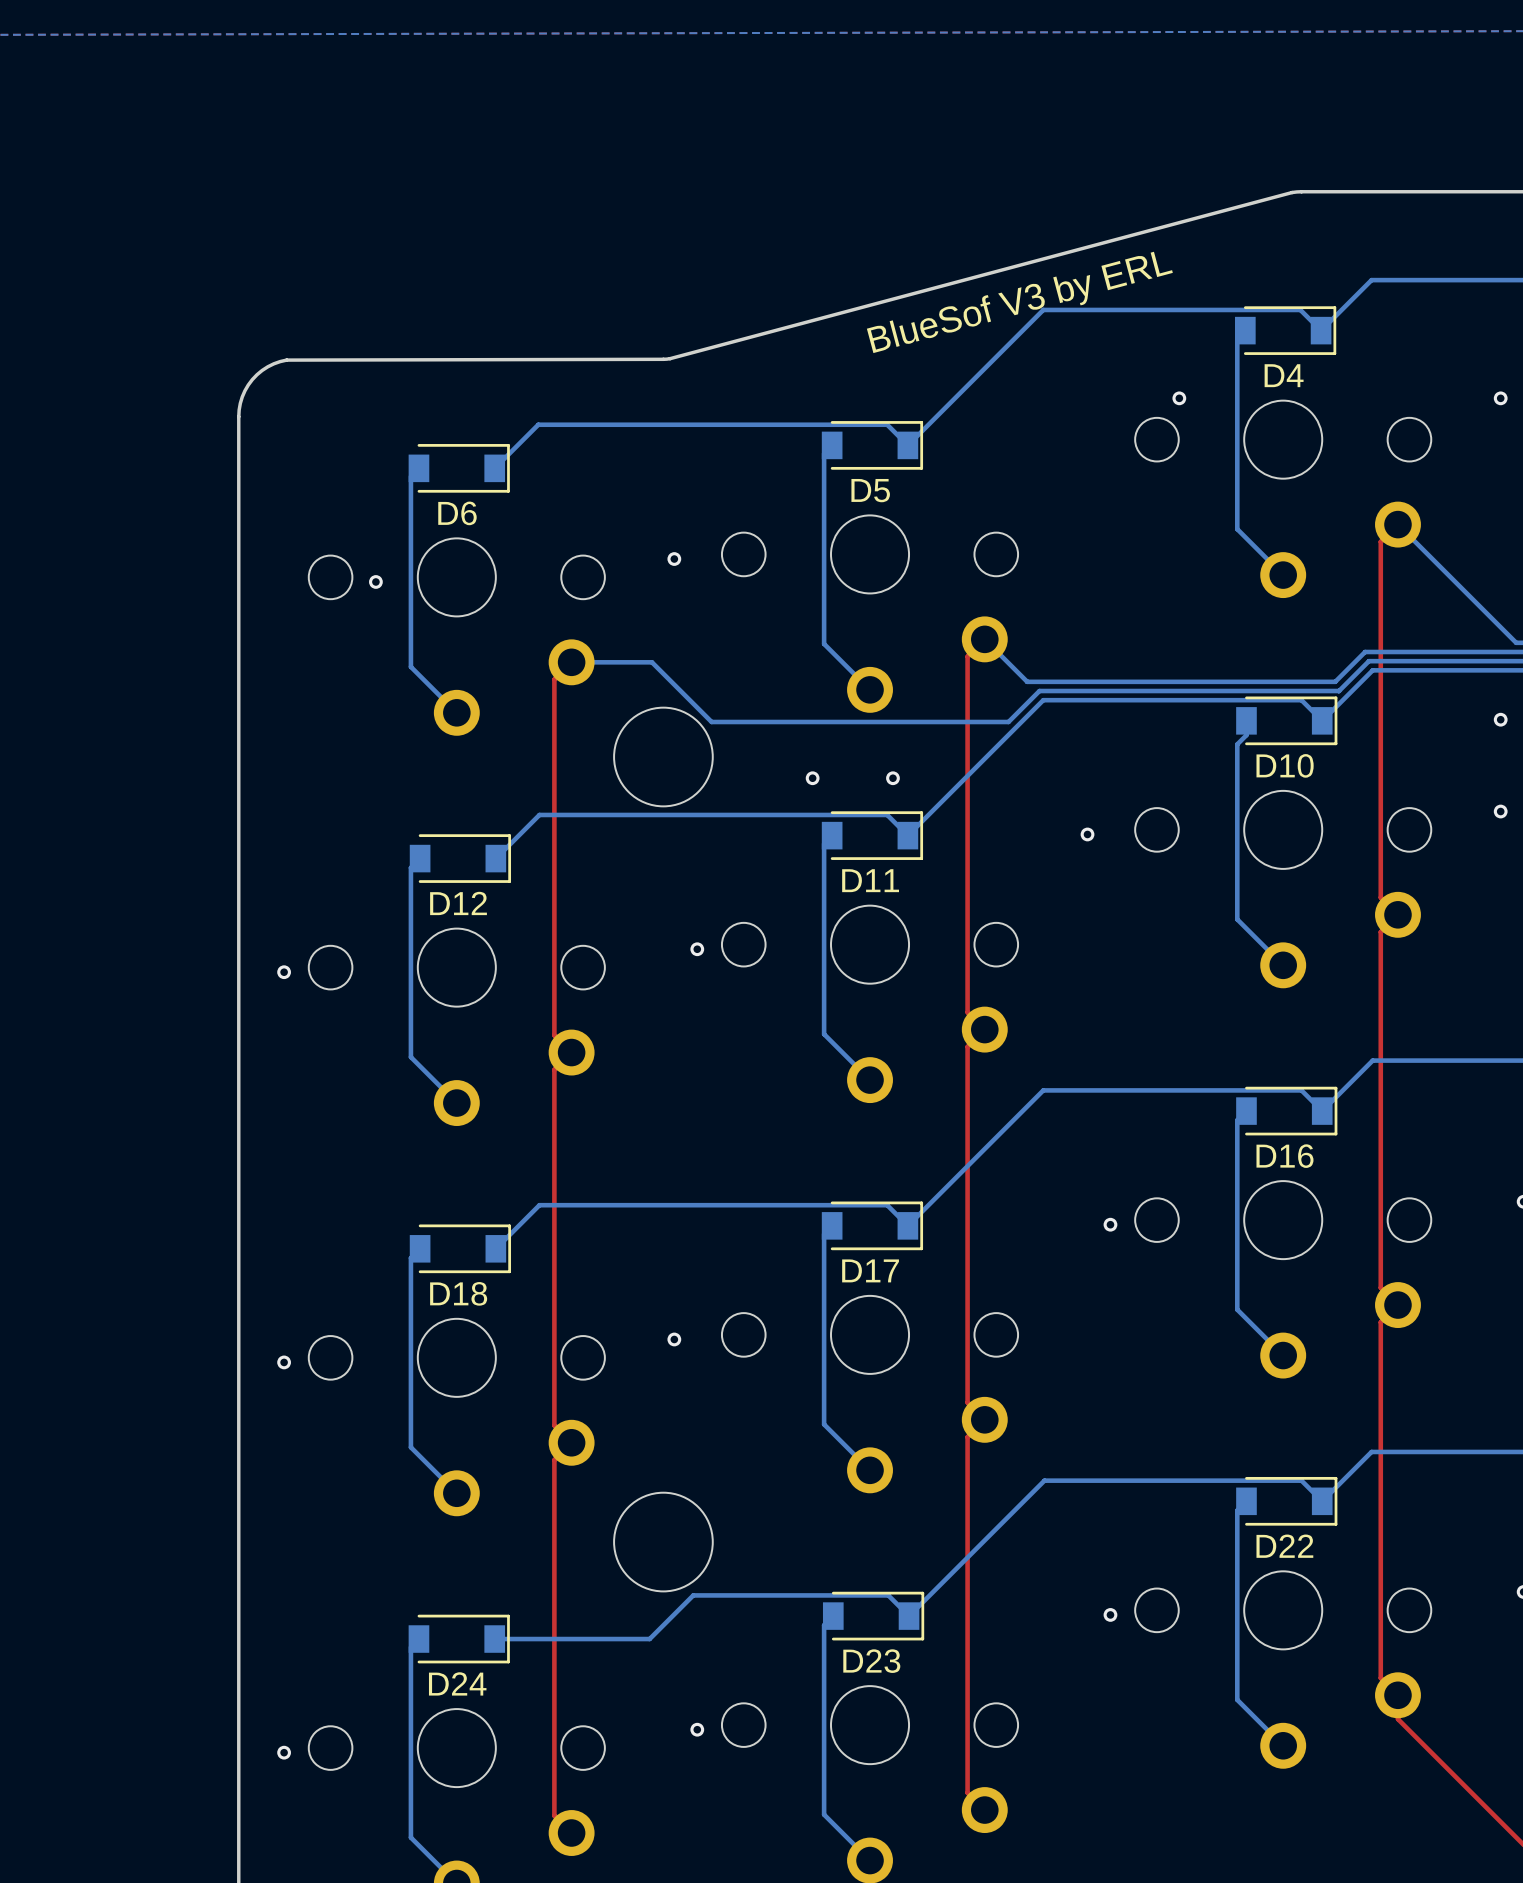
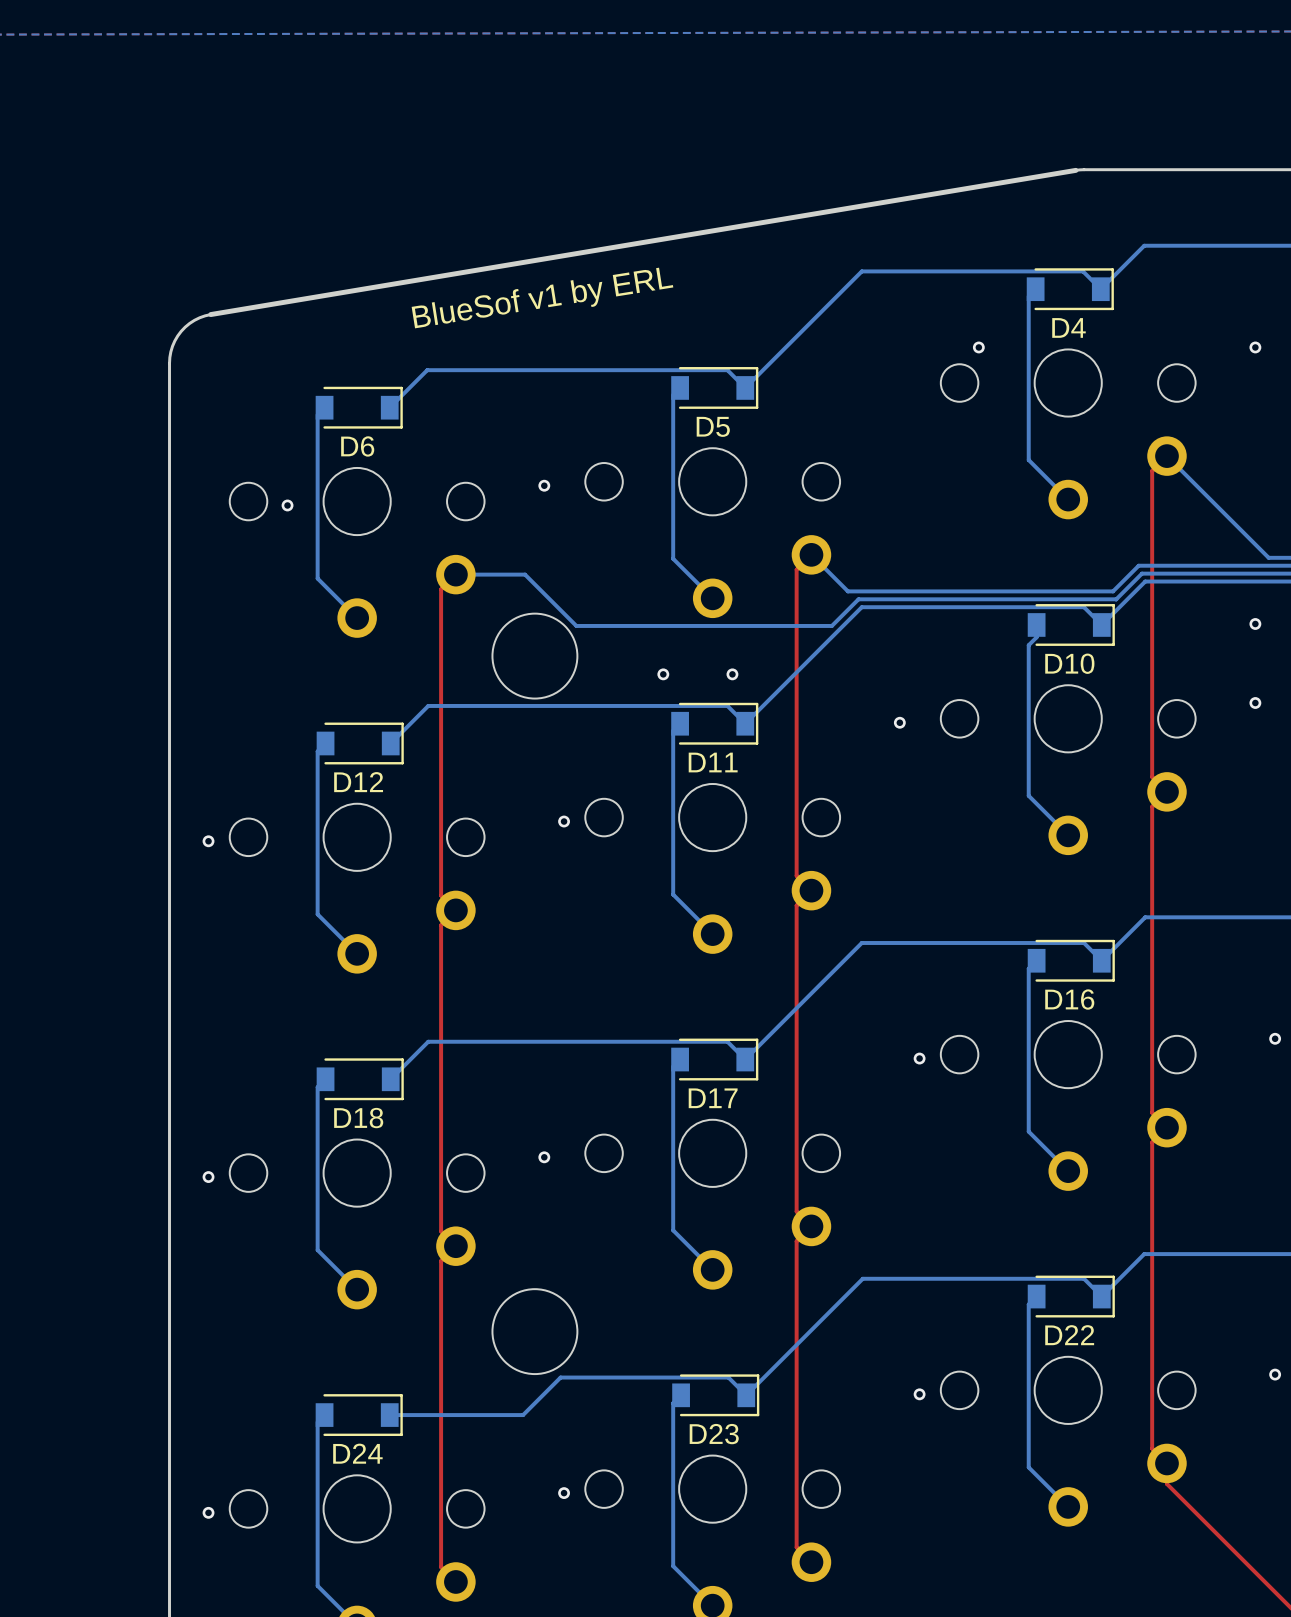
board edge: (1292, 192) (670, 358) (286, 360) -> (1075, 170) (210, 314)
text: BlueSof V3 by ERL (1019, 302) -> BlueSof v1 by ERL (542, 298)

